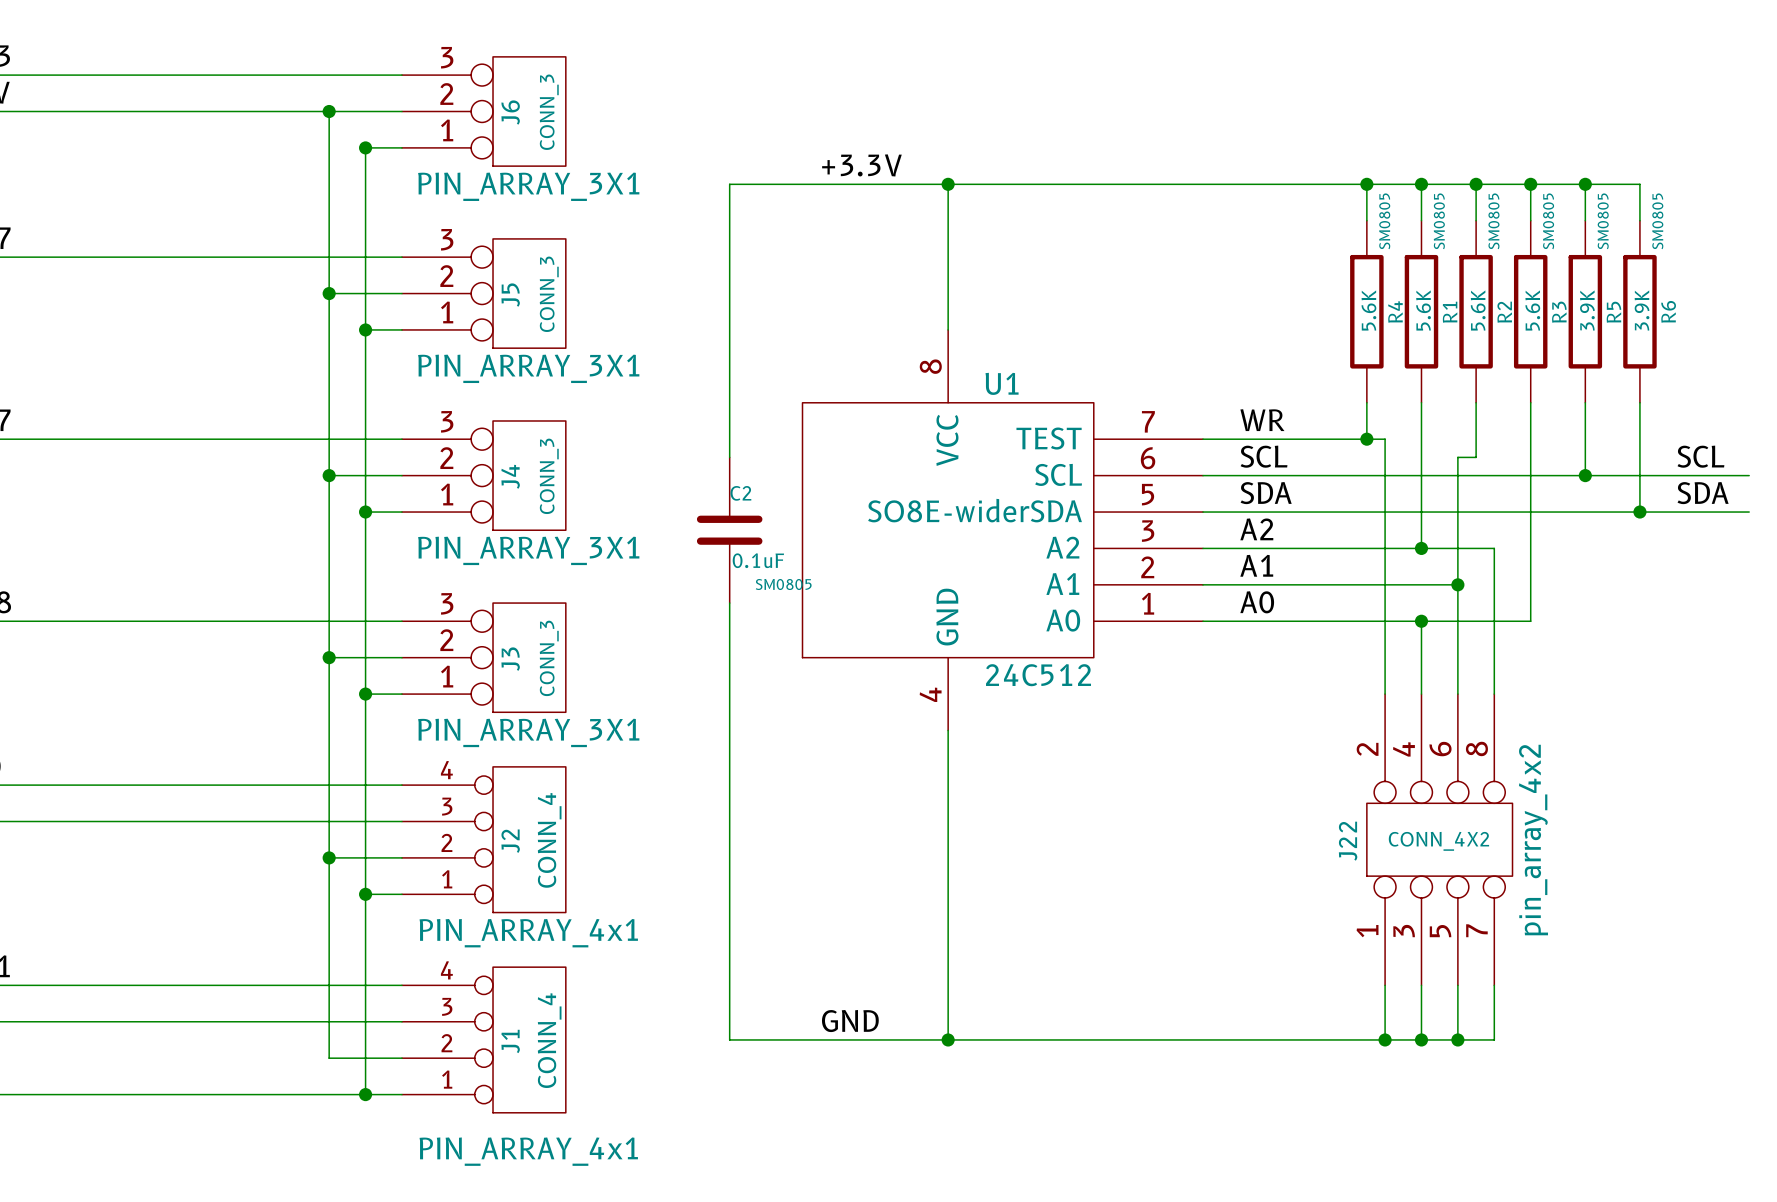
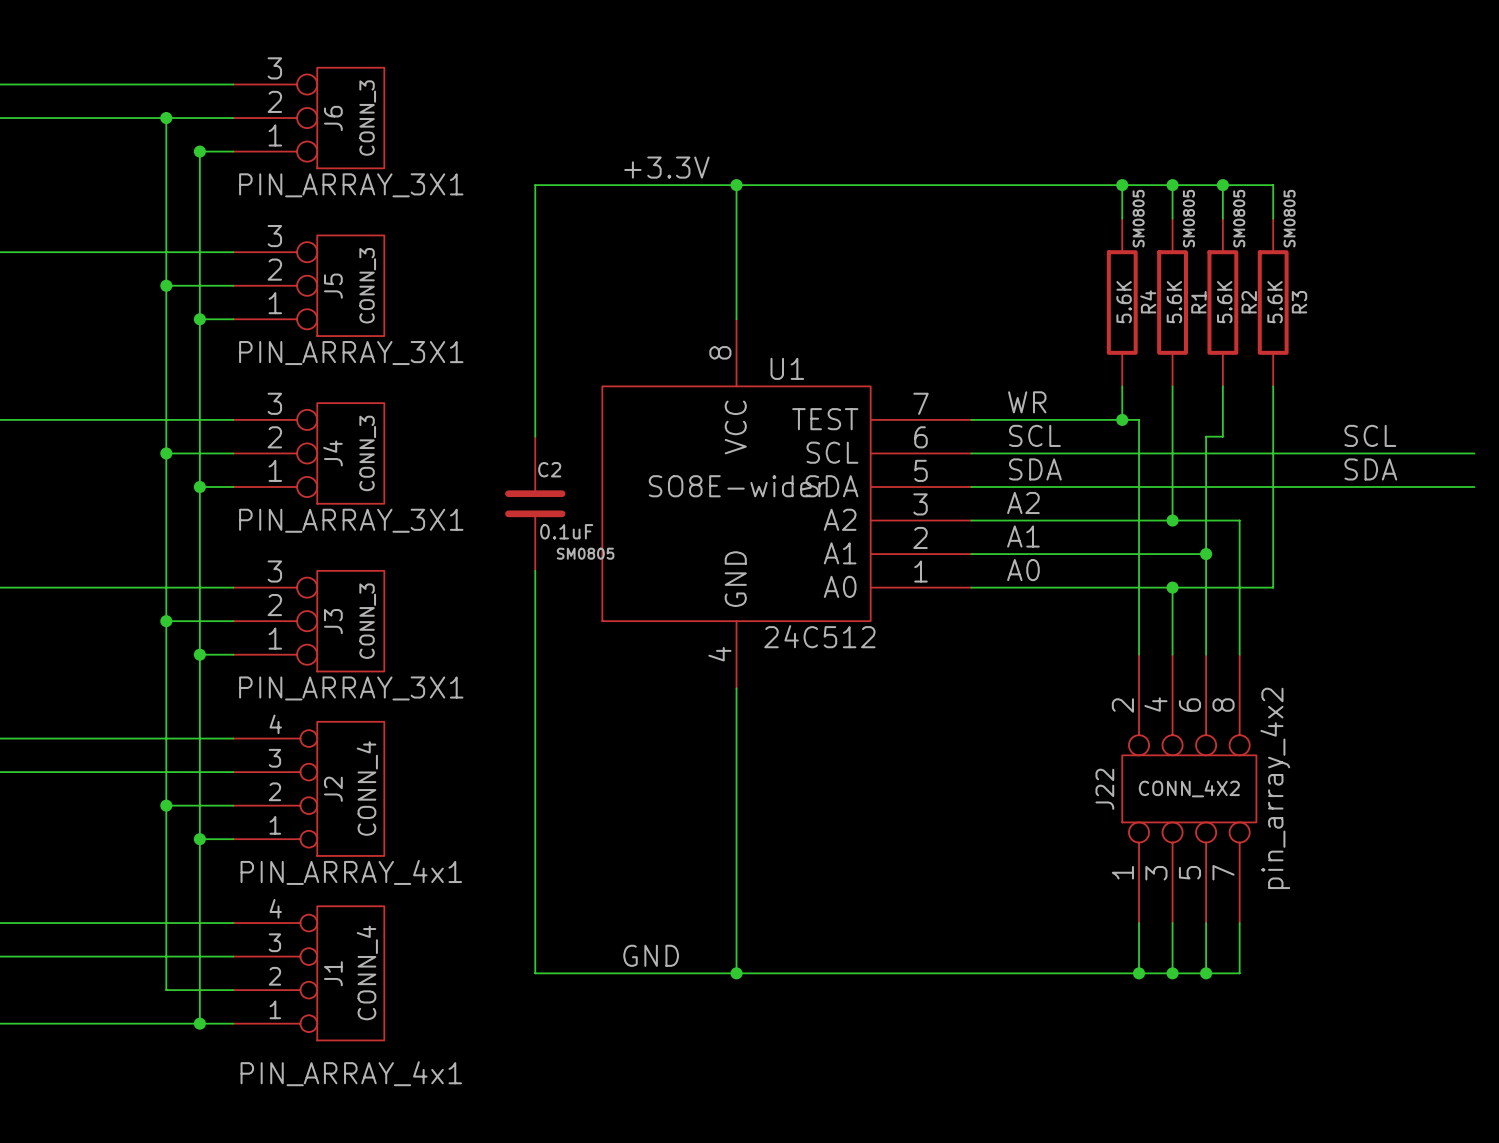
wire: (1530, 184) (1639, 184) (1639, 220) -> none
junction: (1530, 184) -> none
wire: (1585, 184) (1585, 220) -> none
junction: (1585, 184) -> none
R5: 3.9K (1585, 311) -> none
R6: 3.9K (1639, 311) -> none
wire: (1585, 402) (1585, 475) -> none
wire: (1639, 402) (1639, 512) -> none
label position: SCL (1700, 456) -> SCL (1370, 435)
junction: (1585, 475) -> none
label position: SDA (1703, 493) -> SDA (1370, 469)
junction: (1639, 512) -> none

